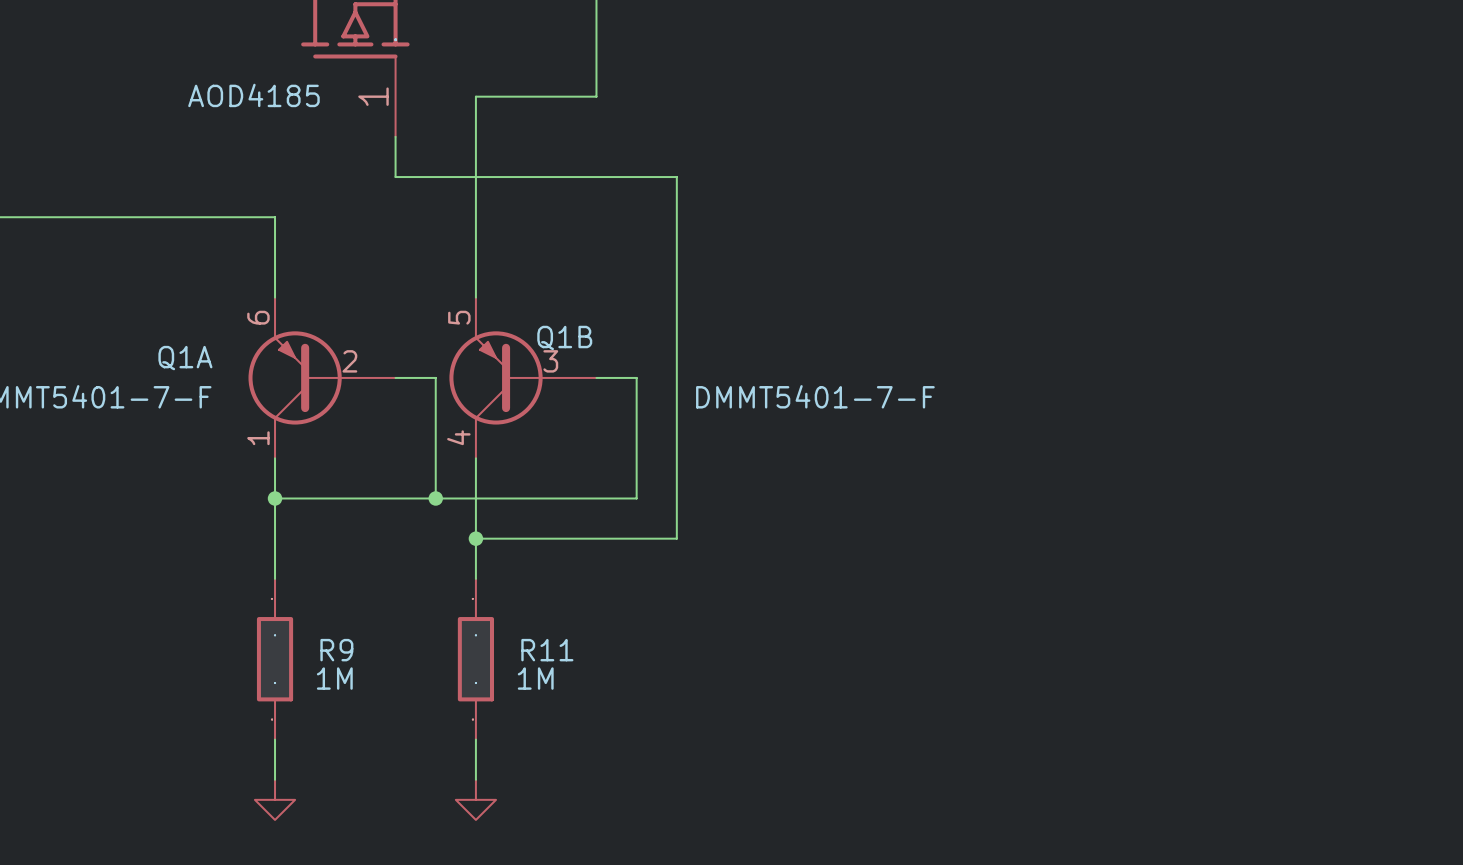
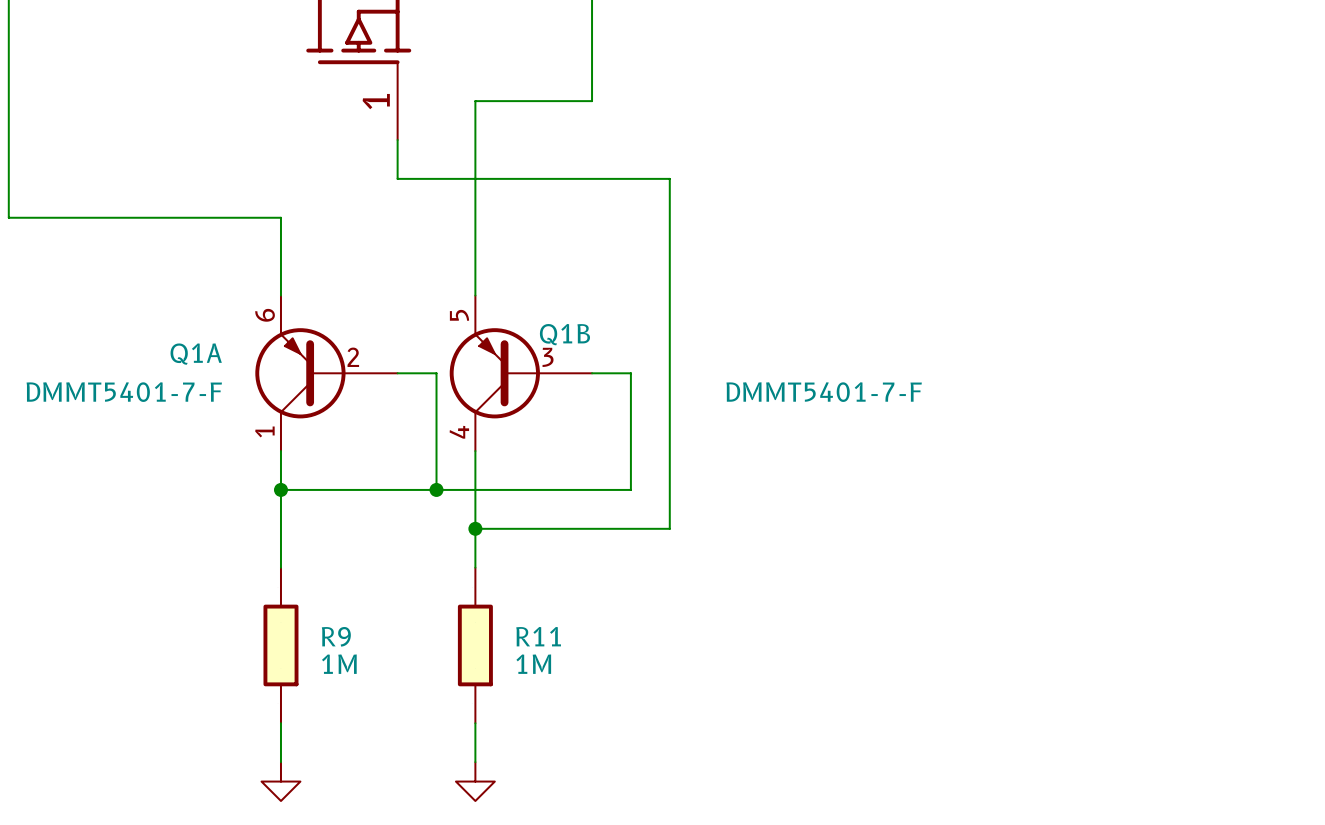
part value: AOD4185 (253, 95) -> none

